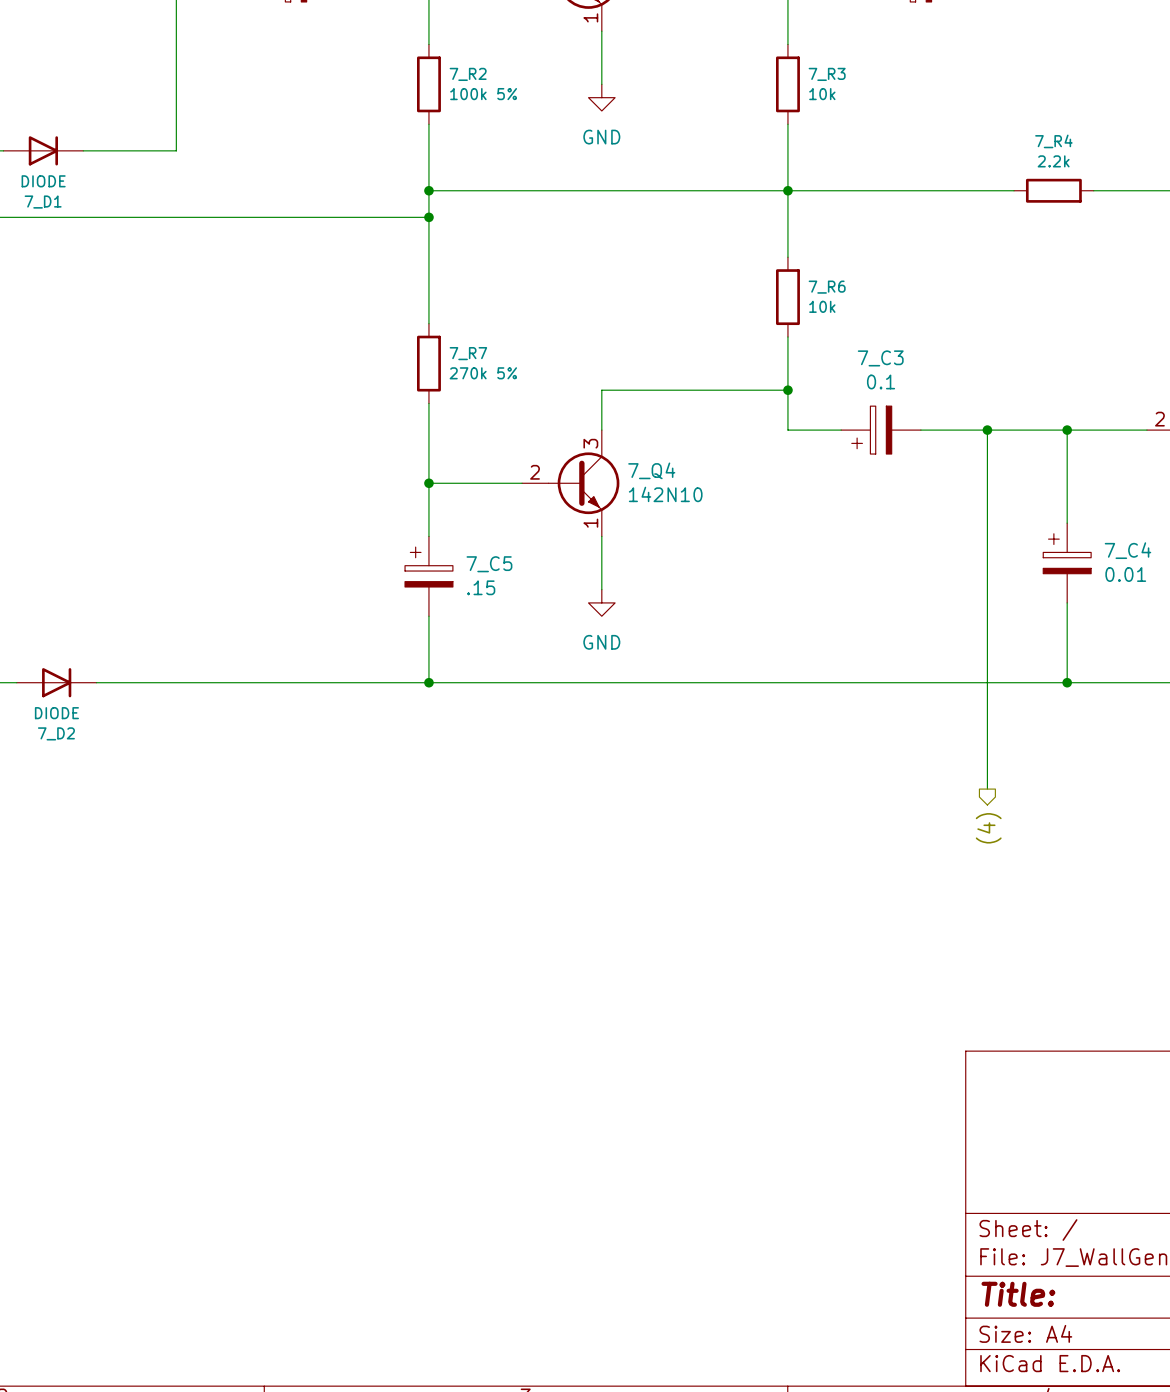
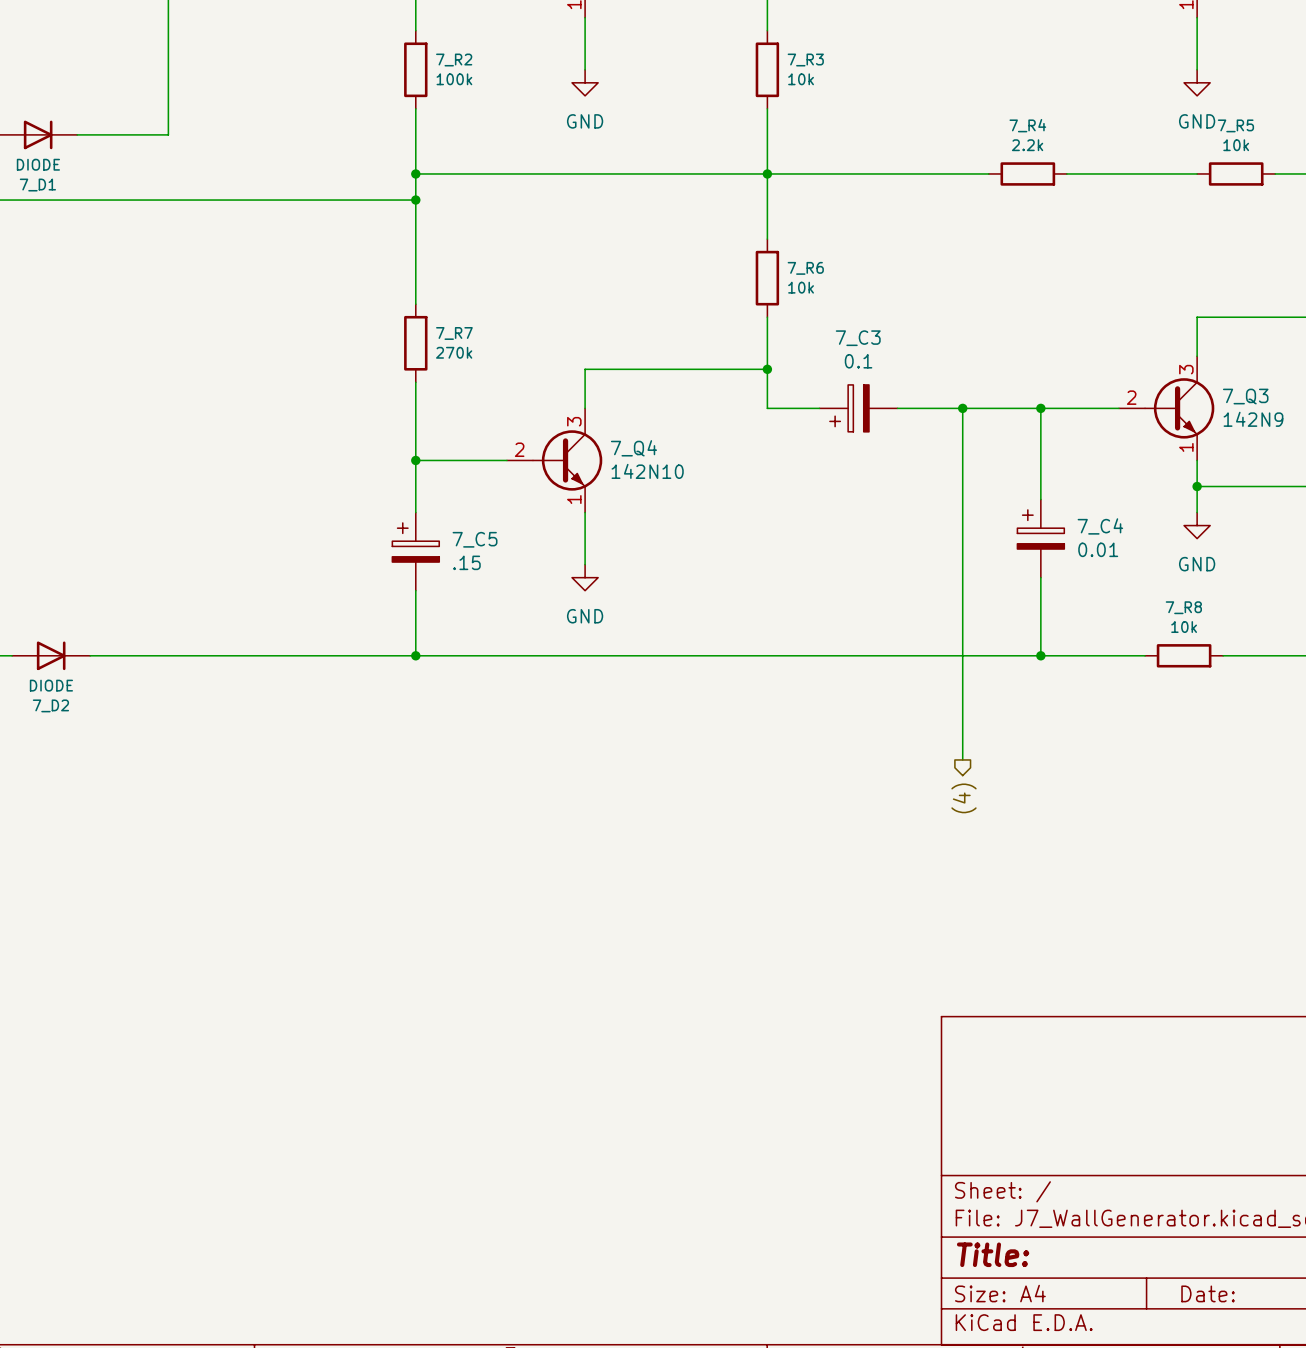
7_R2 value: 100k 5% (483, 94) -> 100k (454, 79)
7_R7 value: 270k 5% (483, 373) -> 270k (454, 352)

